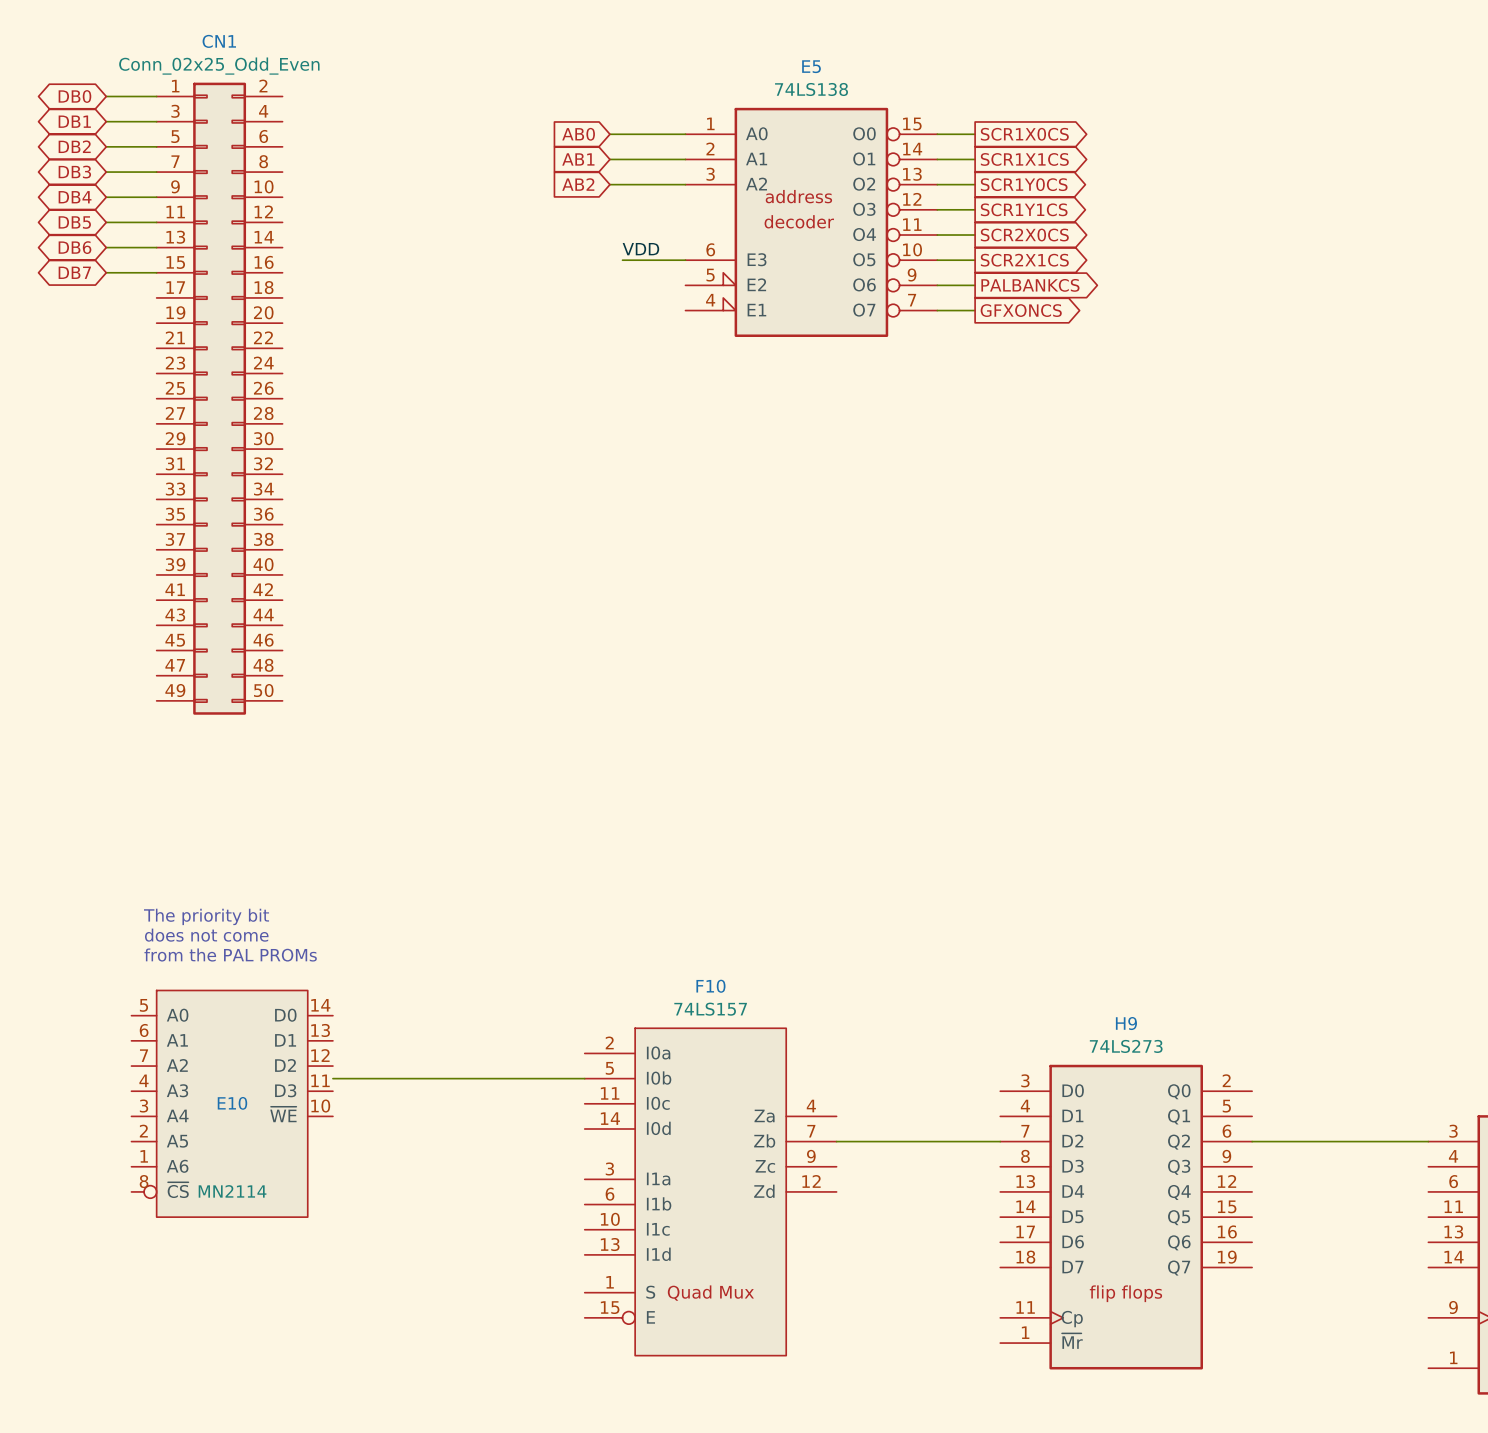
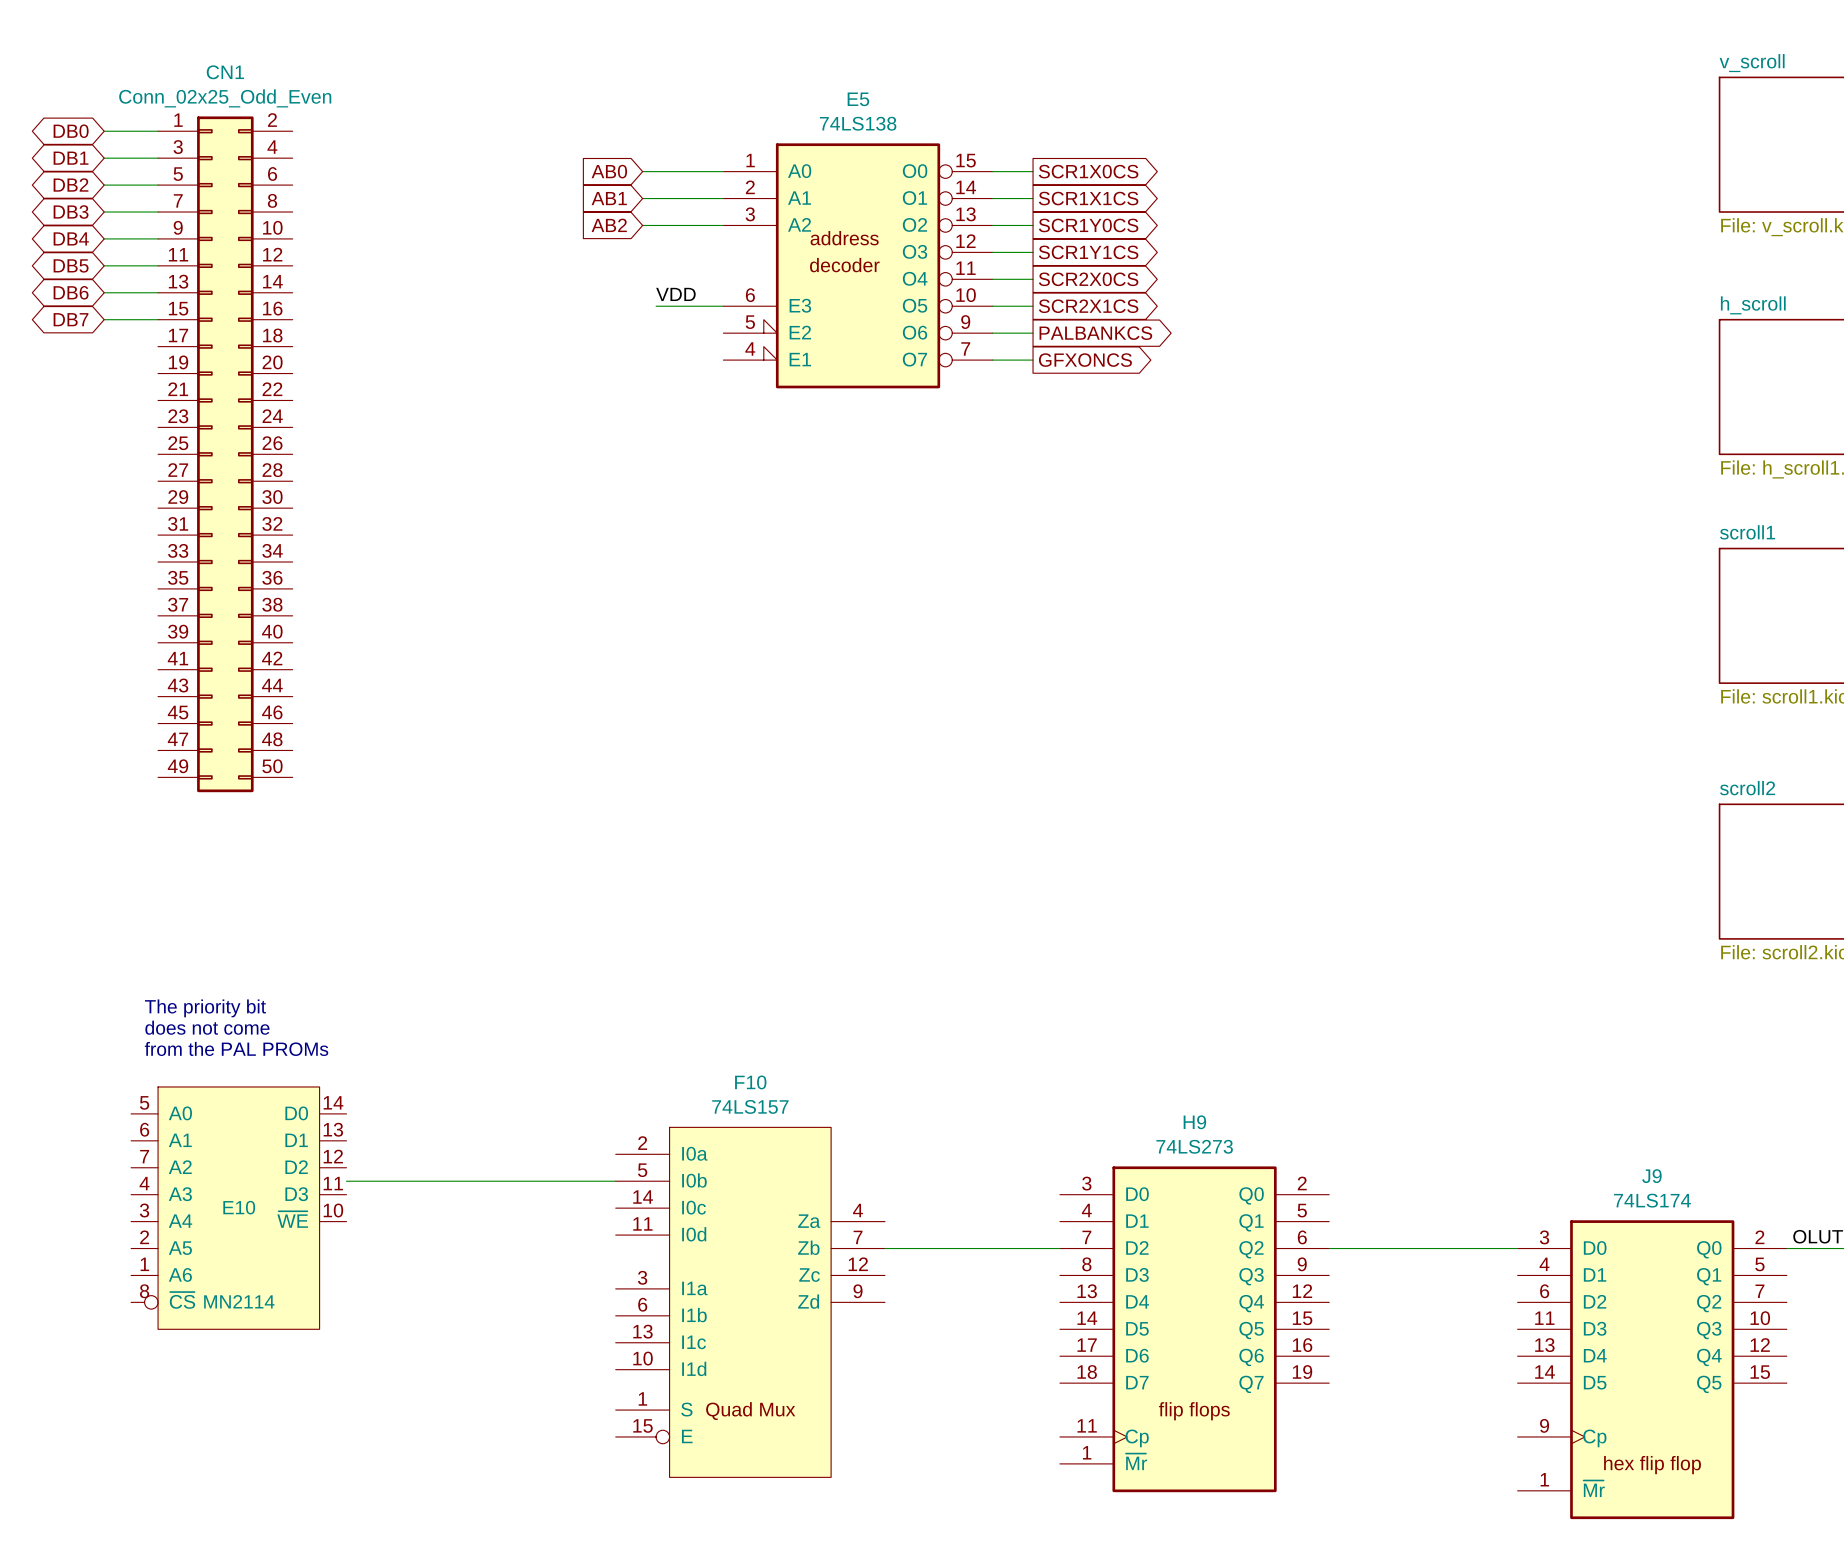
F10 pin number: 11 (610, 1093) -> 14 (643, 1197)
F10 pin number: 14 (610, 1118) -> 11 (642, 1223)
F10 pin number: 9 (811, 1156) -> 12 (858, 1264)
F10 pin number: 12 (811, 1181) -> 9 (858, 1291)
F10 pin number: 10 (610, 1219) -> 13 (642, 1331)
F10 pin number: 13 (610, 1244) -> 10 (643, 1358)

